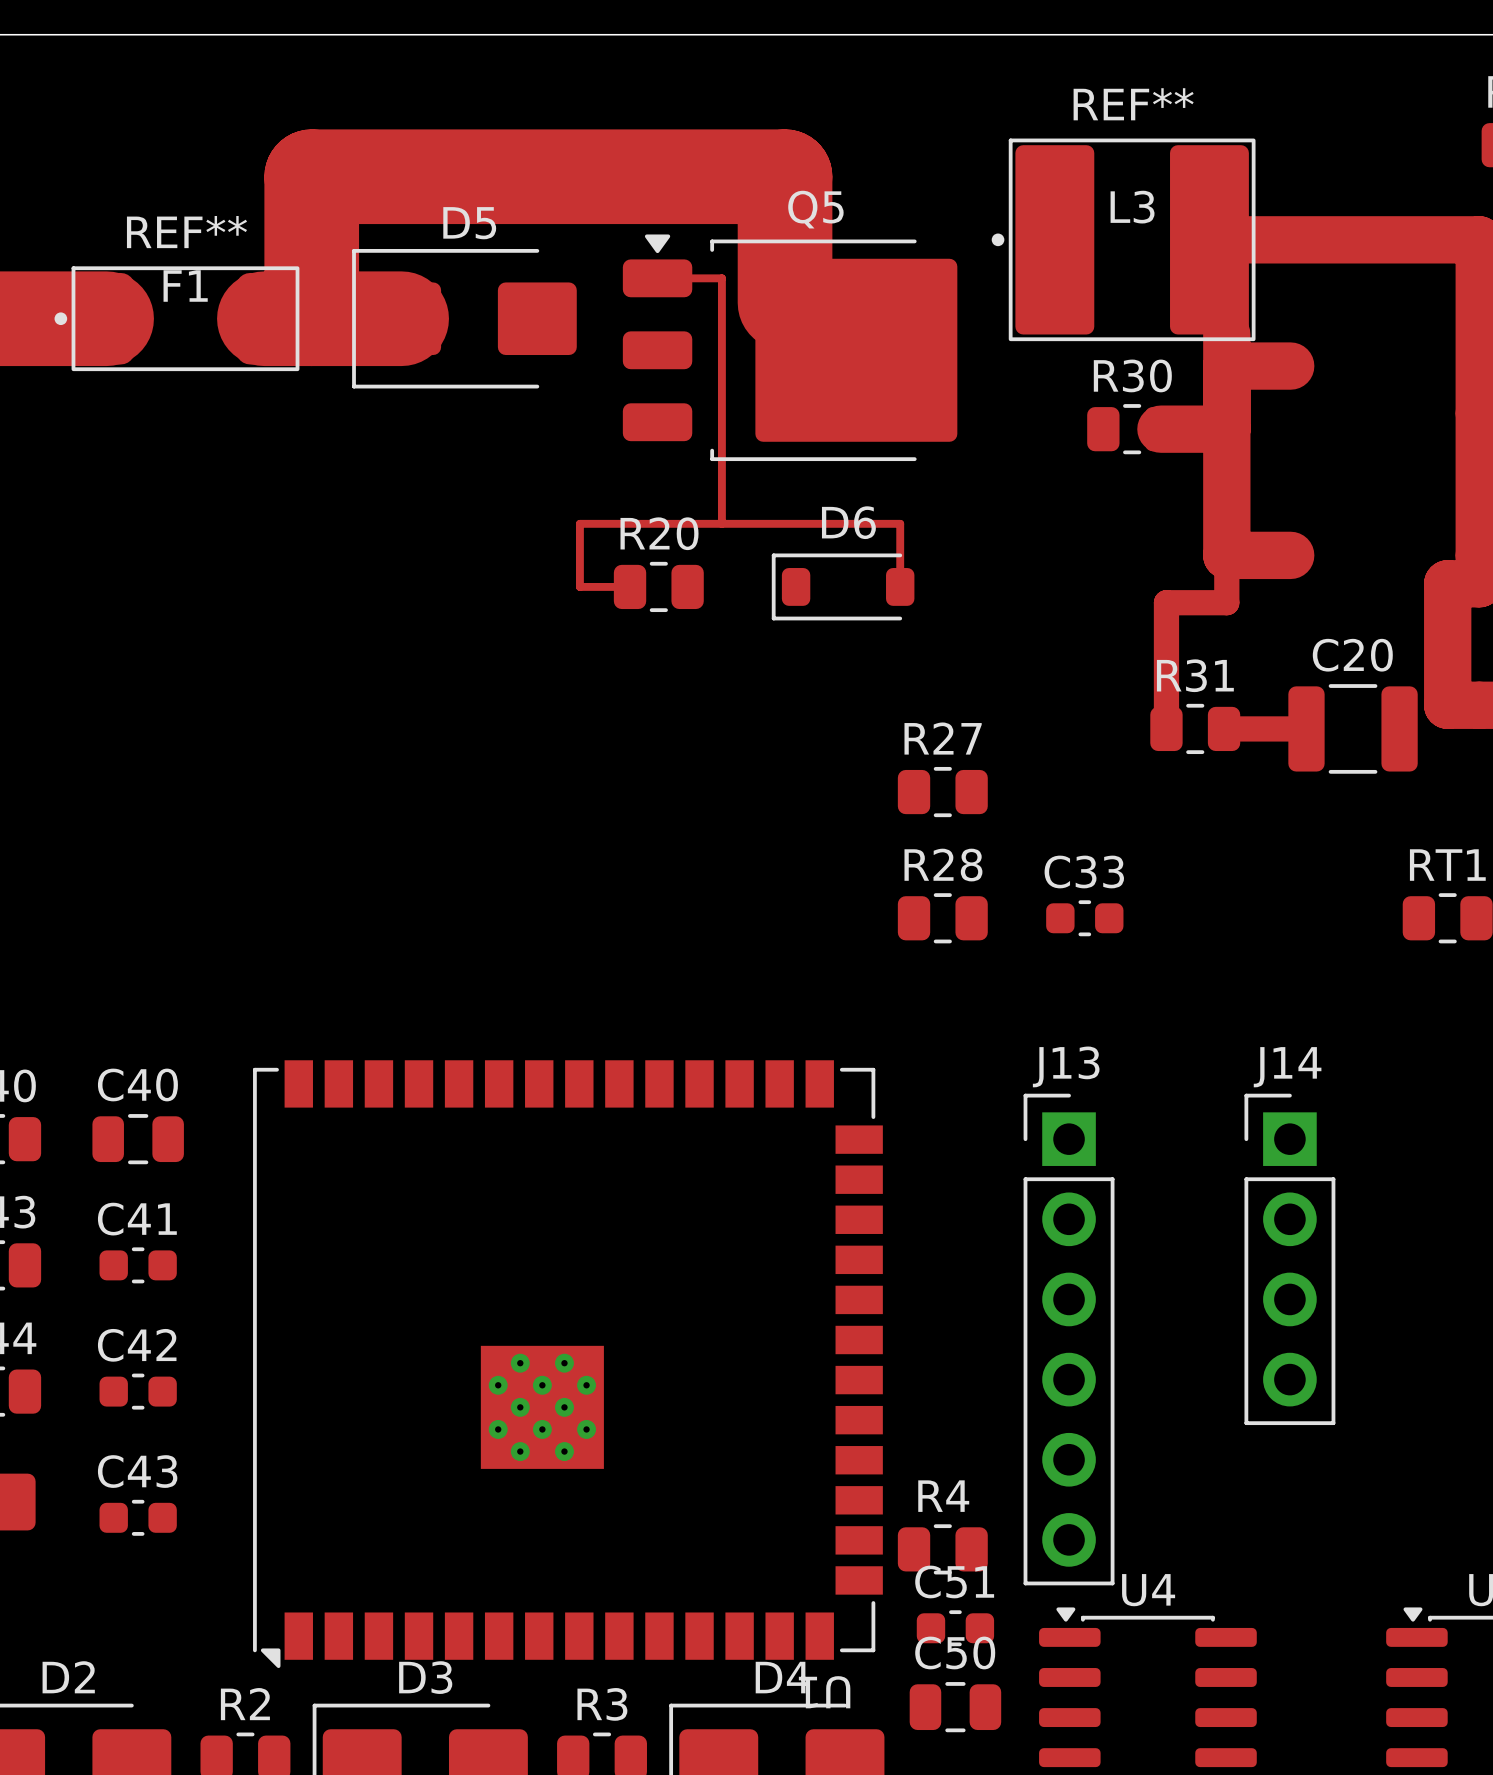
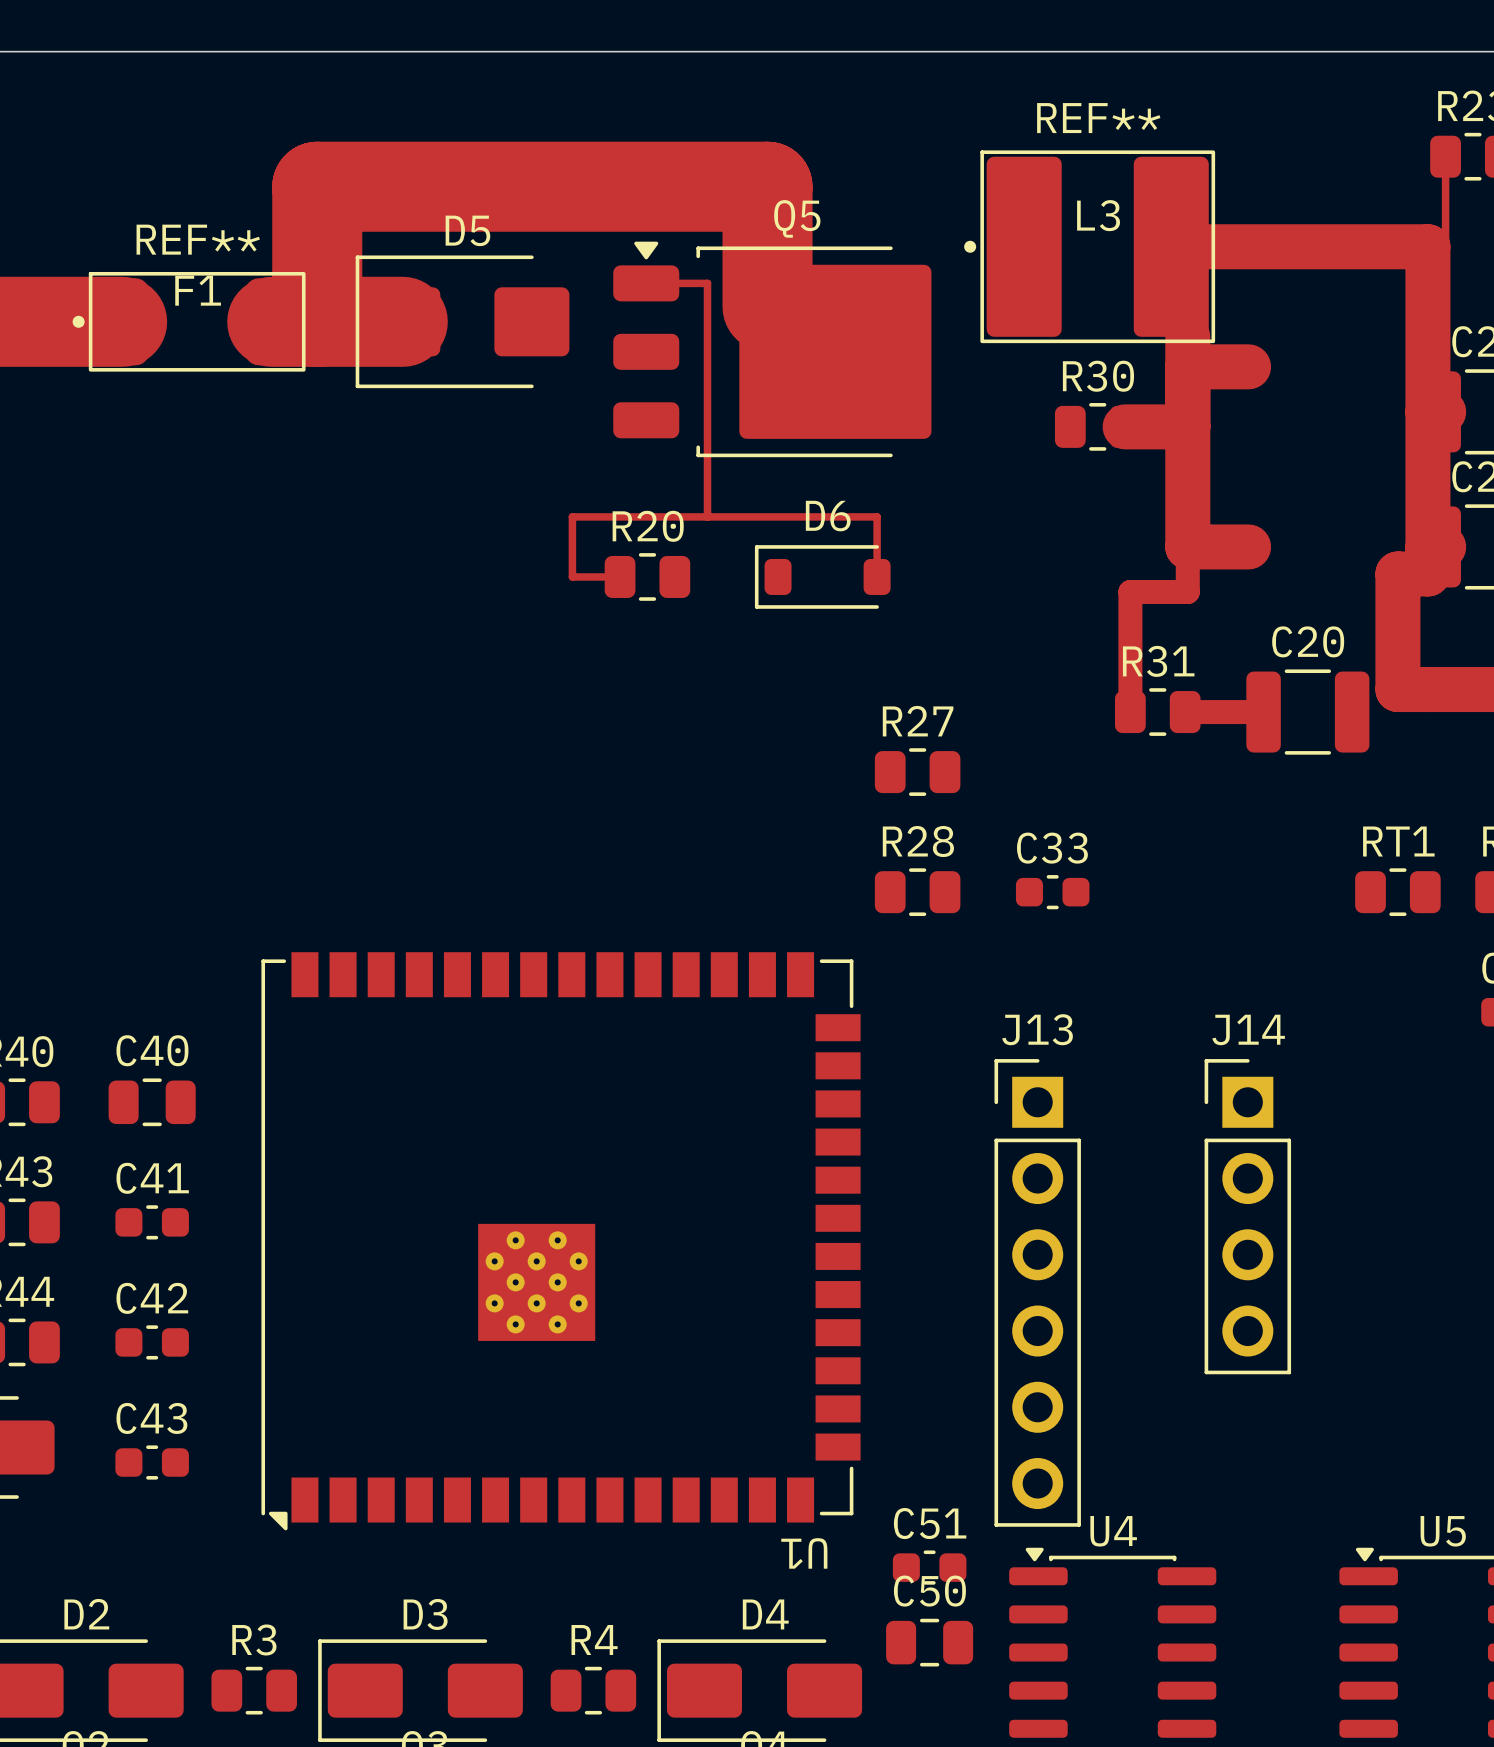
U1 position: (567, 1364) -> (561, 1241)
R4: (942, 1549) -> none
R2 name: R2 (245, 1704) -> R3 (254, 1639)
R3 name: R3 (602, 1704) -> R4 (594, 1639)

